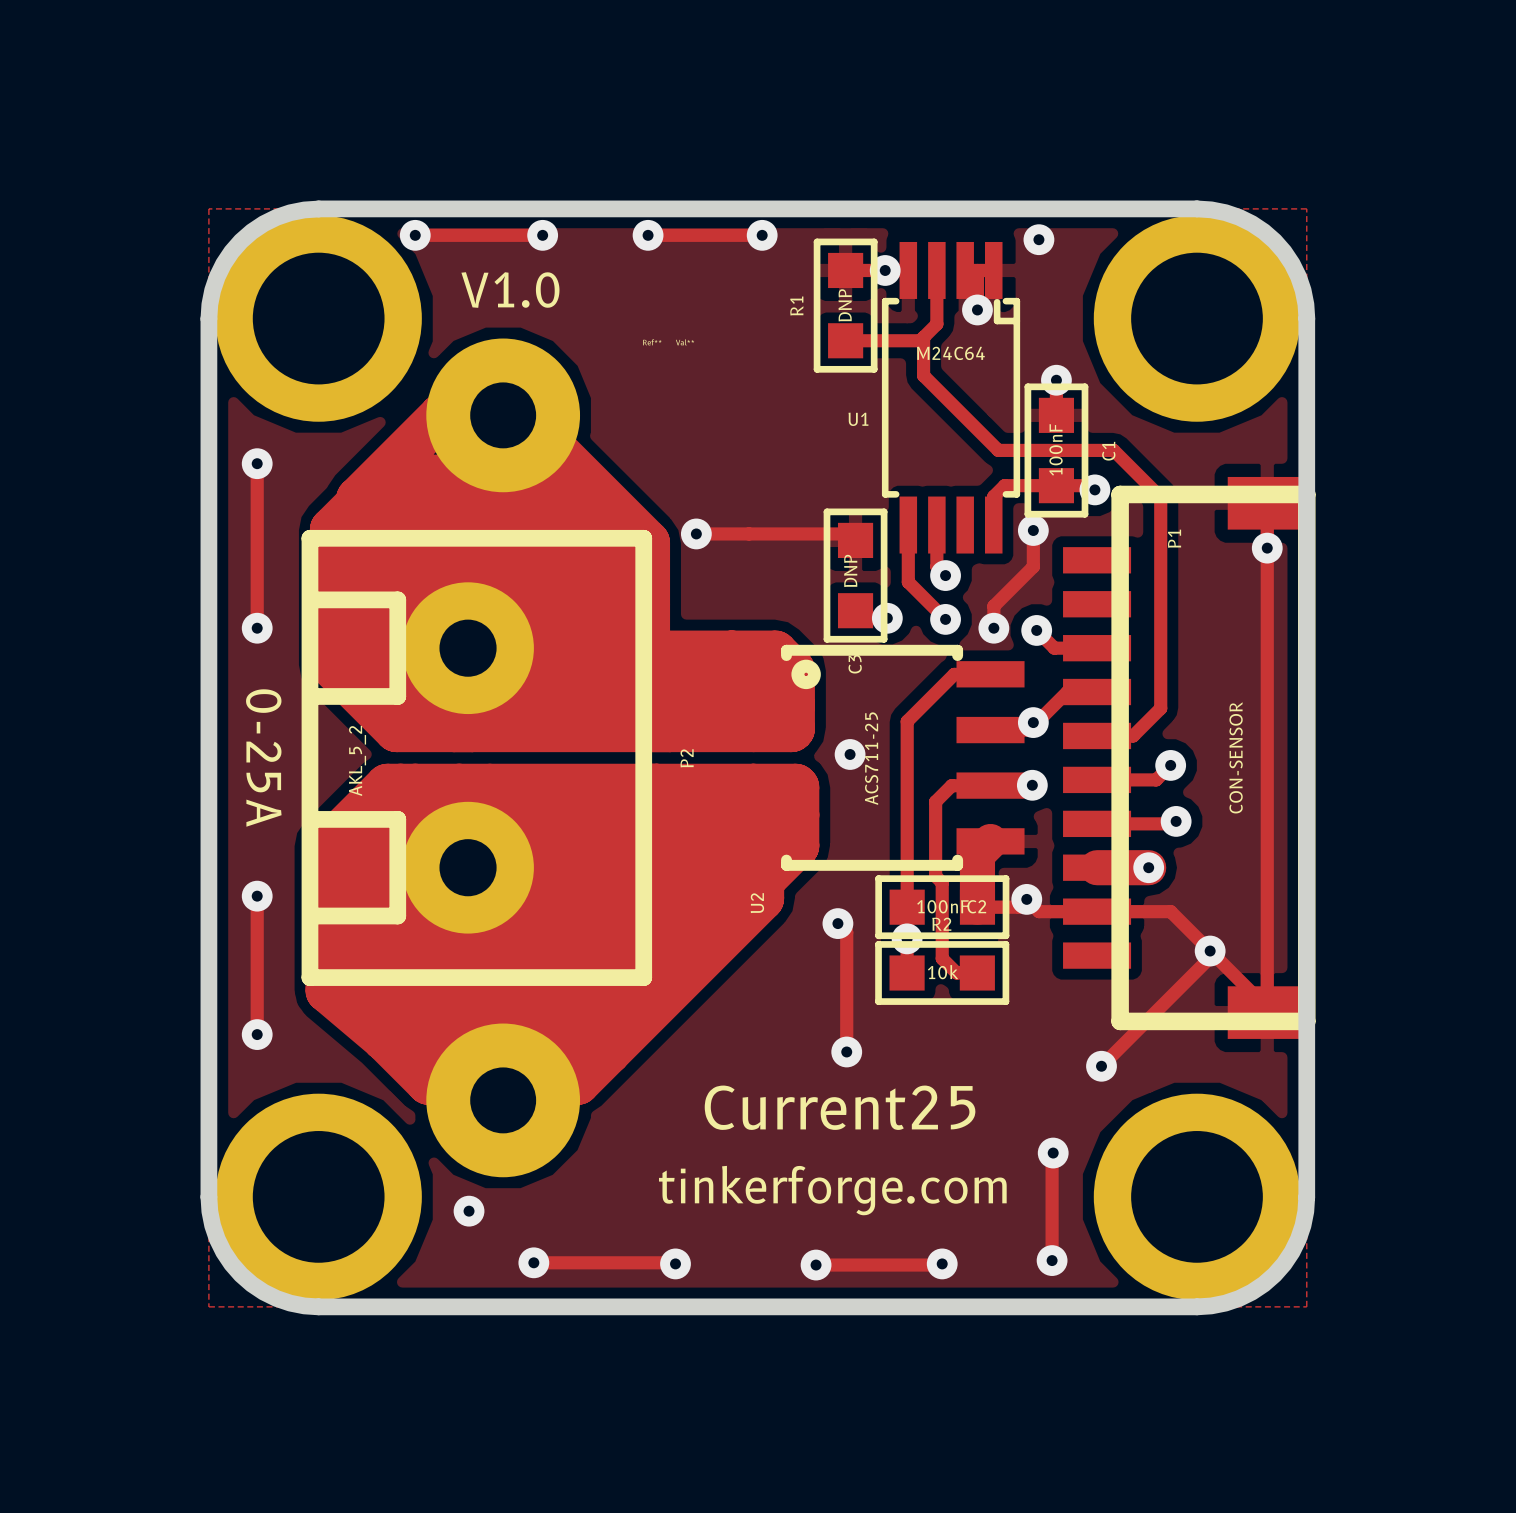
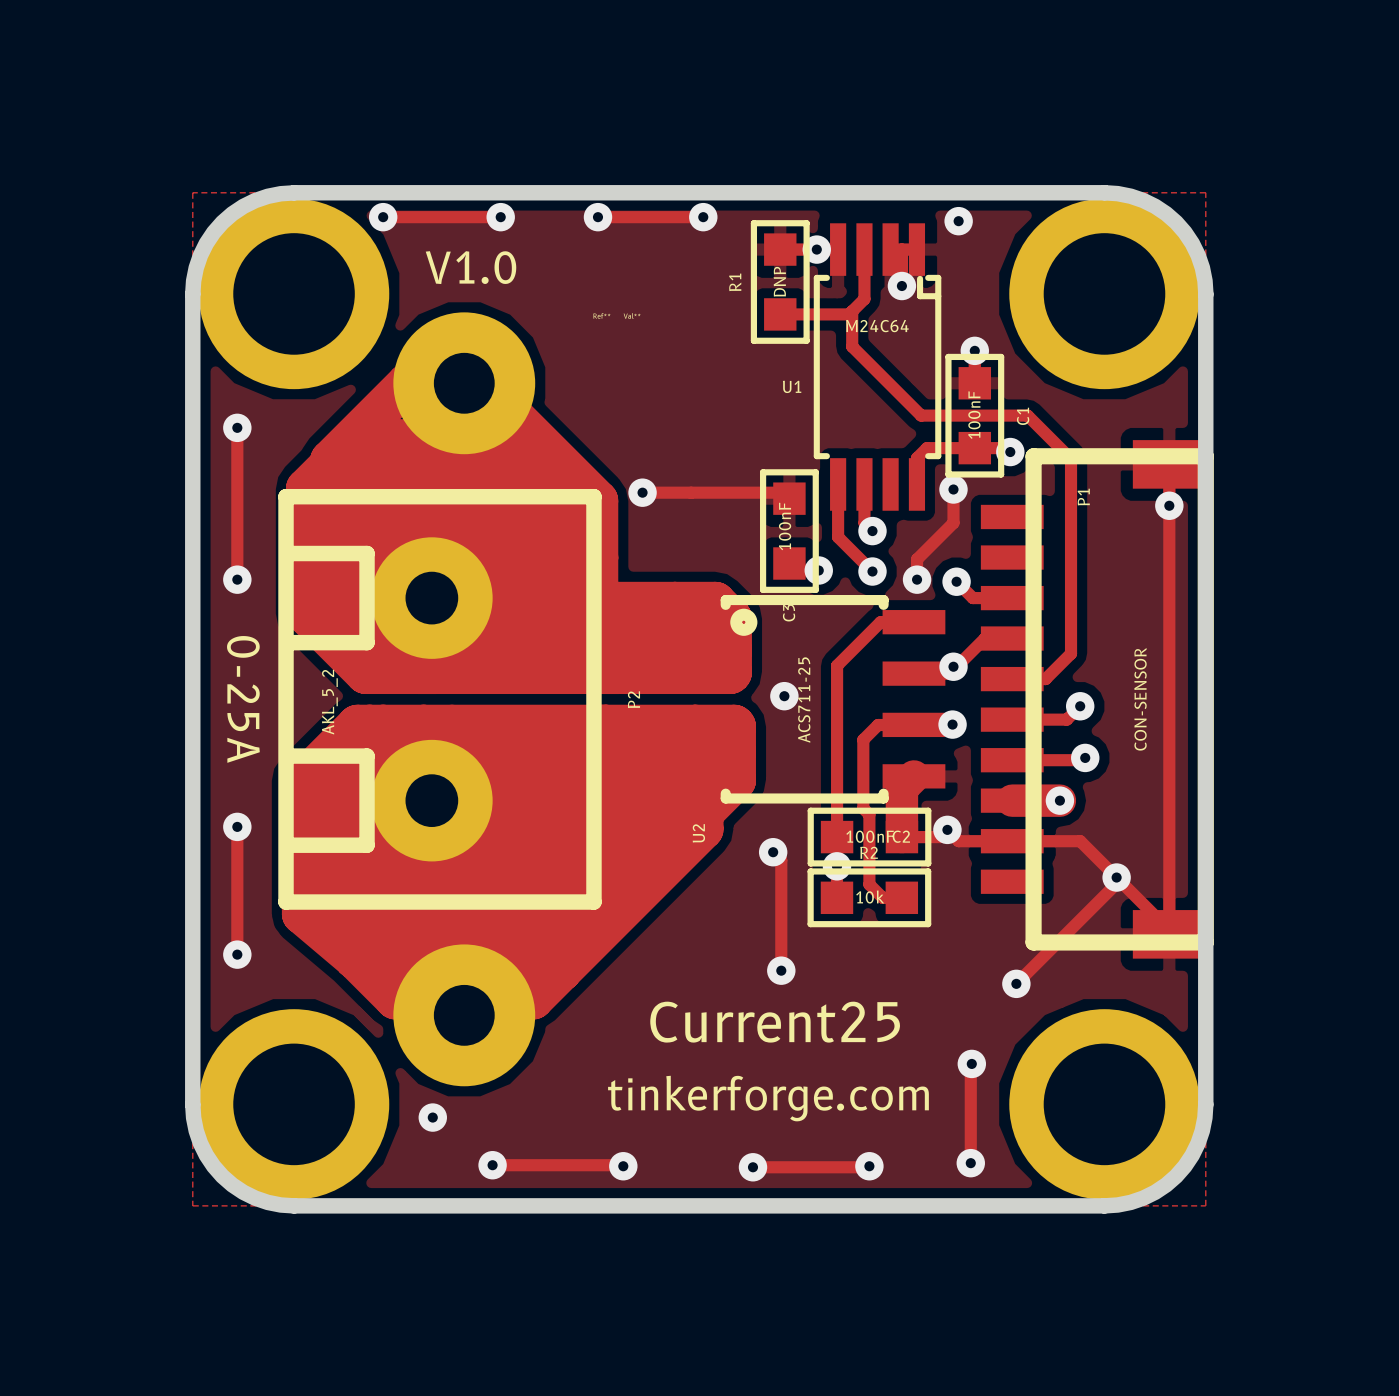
C3 value: DNP (850, 570) -> 100nF (785, 526)

